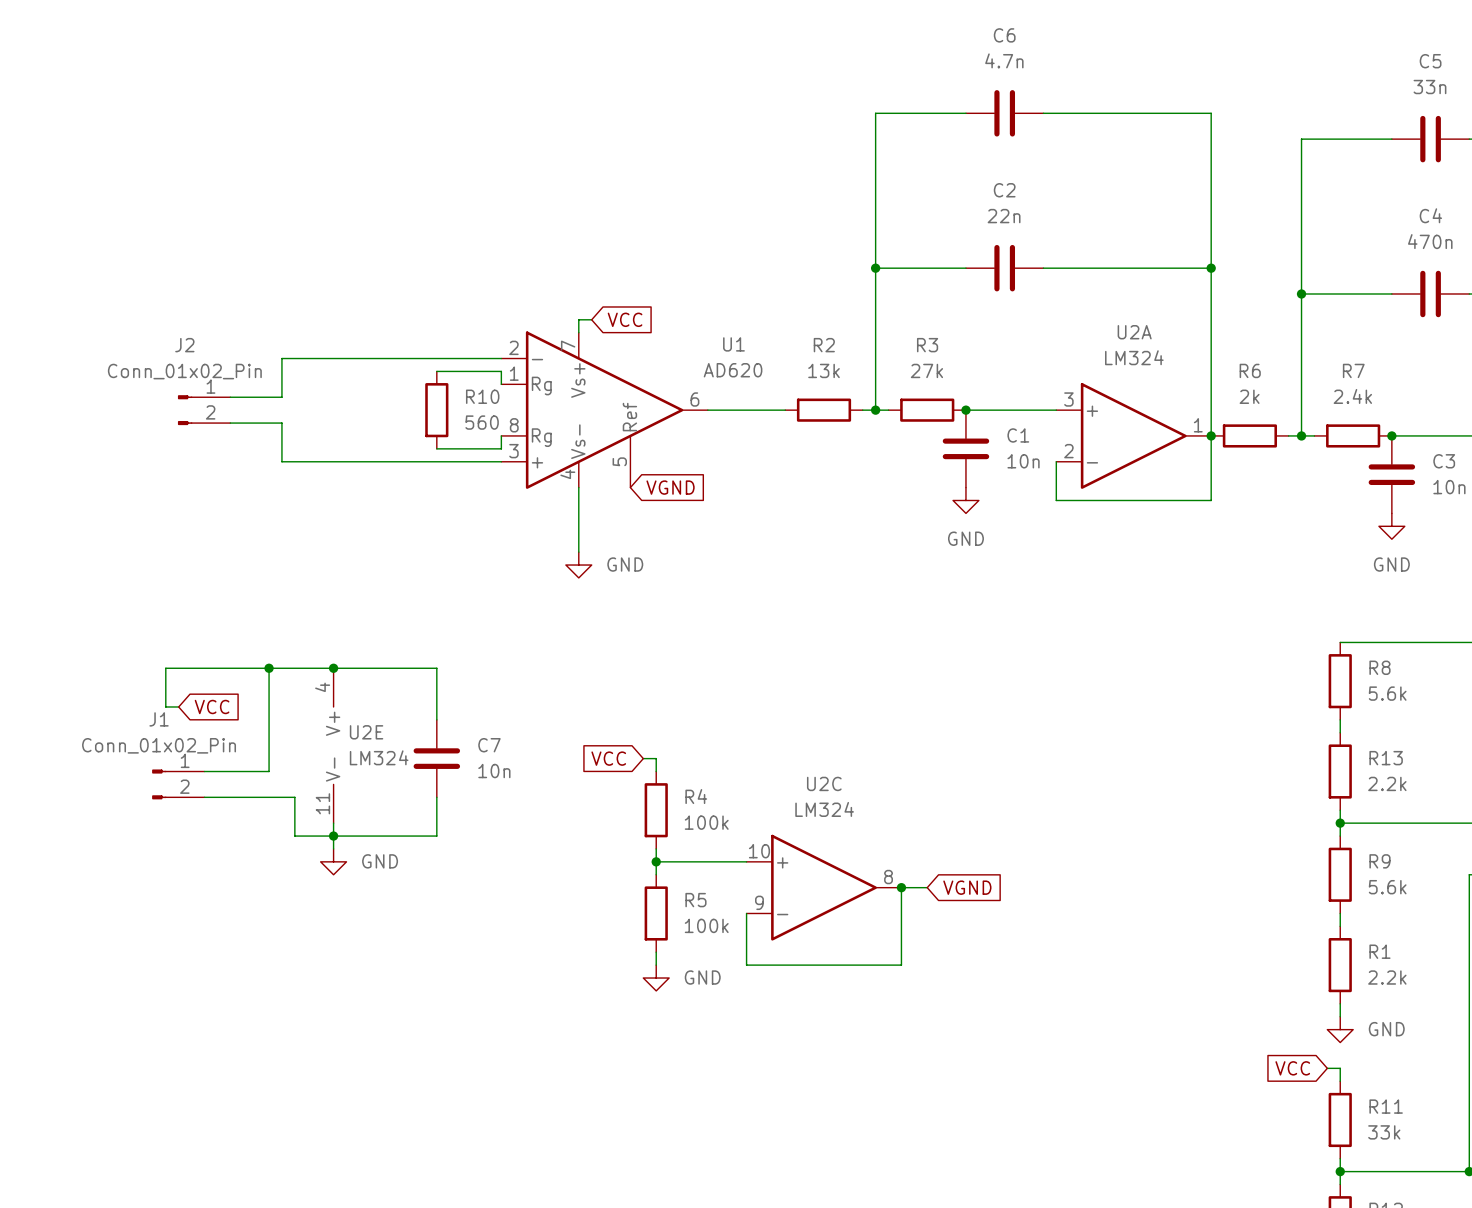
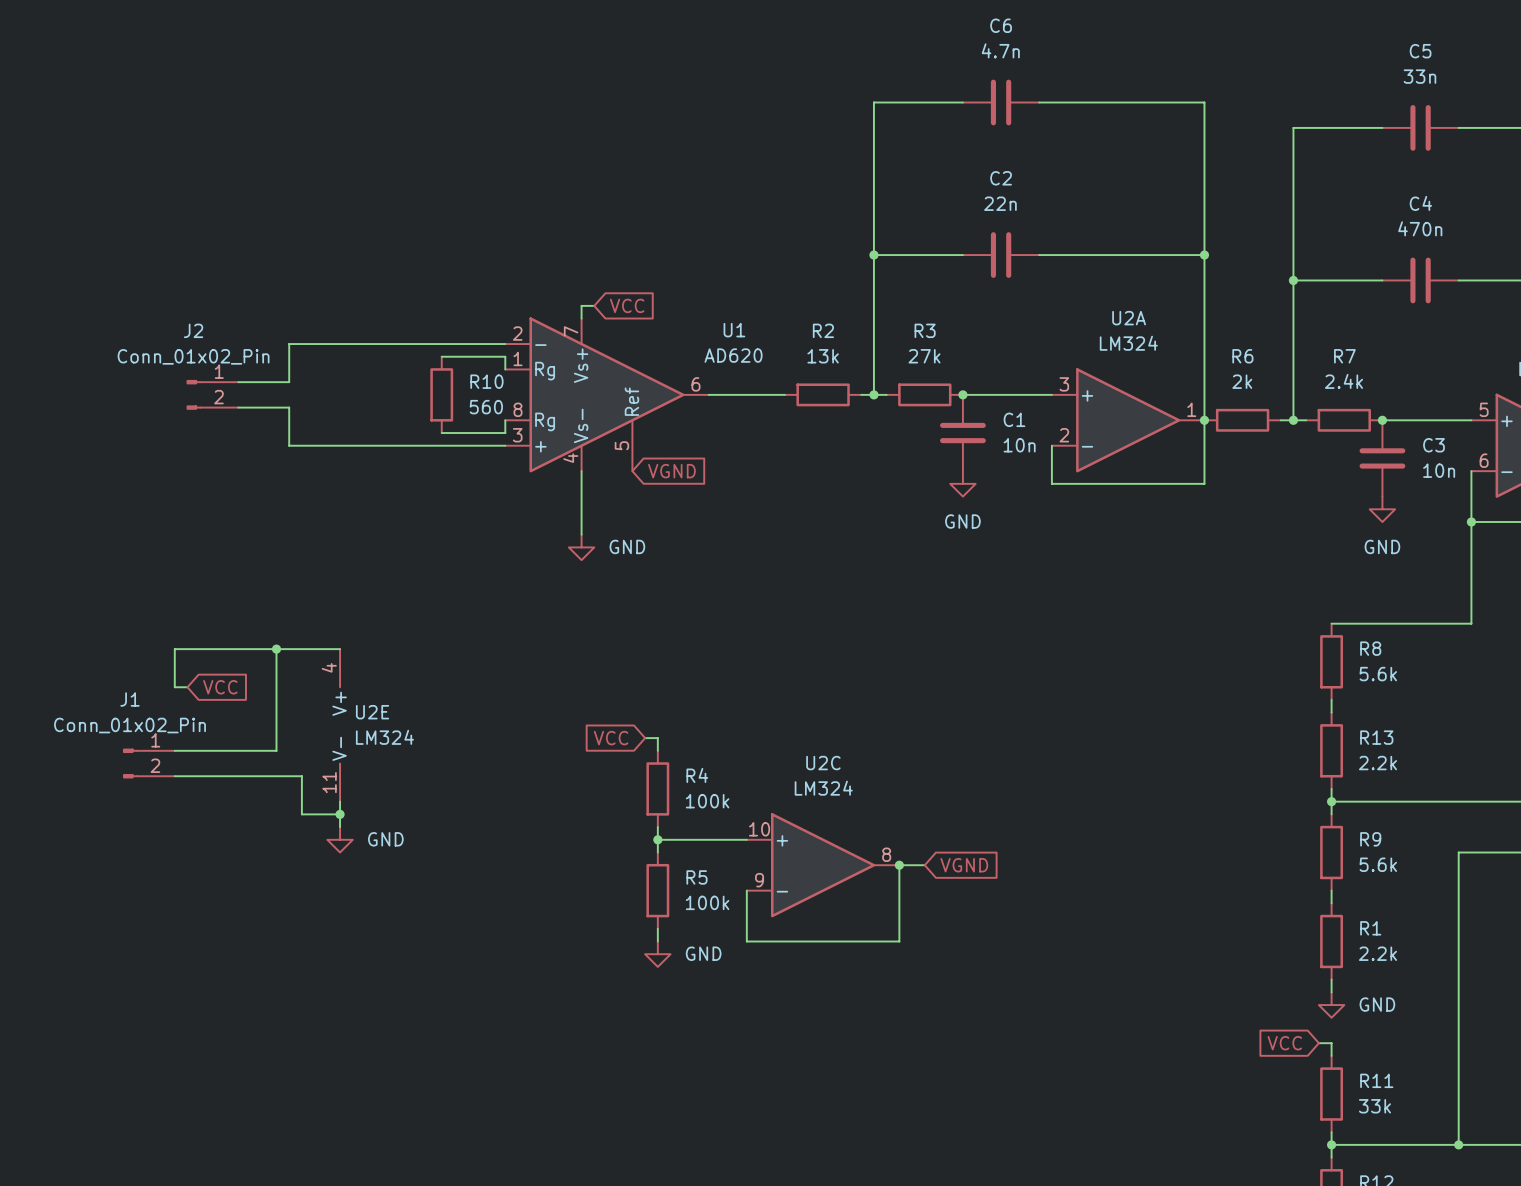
wire: (333, 668) (436, 668) (436, 719) -> none
junction: (333, 668) -> none
C7: 10n (436, 758) -> none
J1 position: (178, 784) -> (148, 763)
wire: (436, 797) (436, 836) (333, 836) -> none

